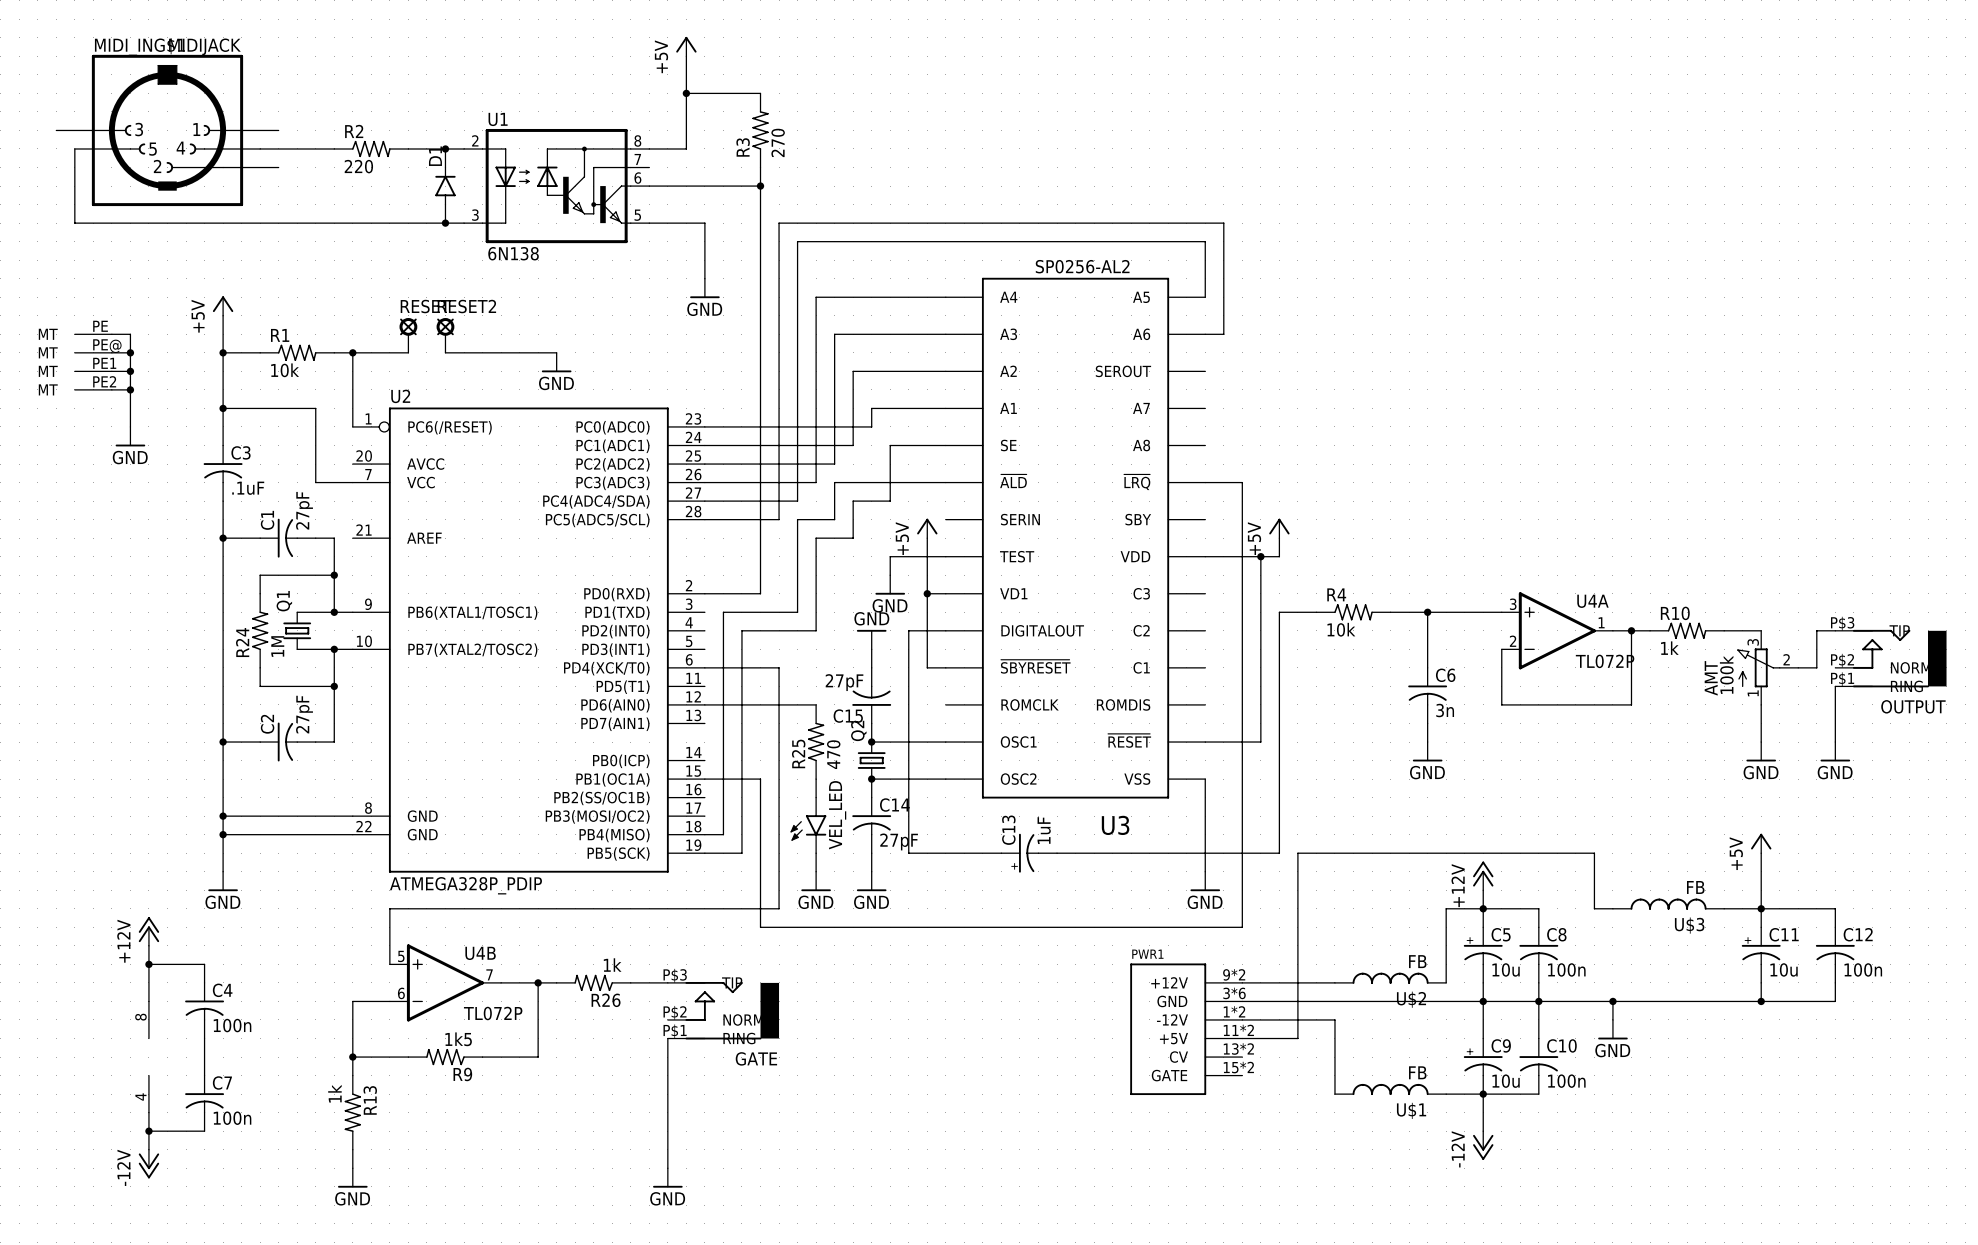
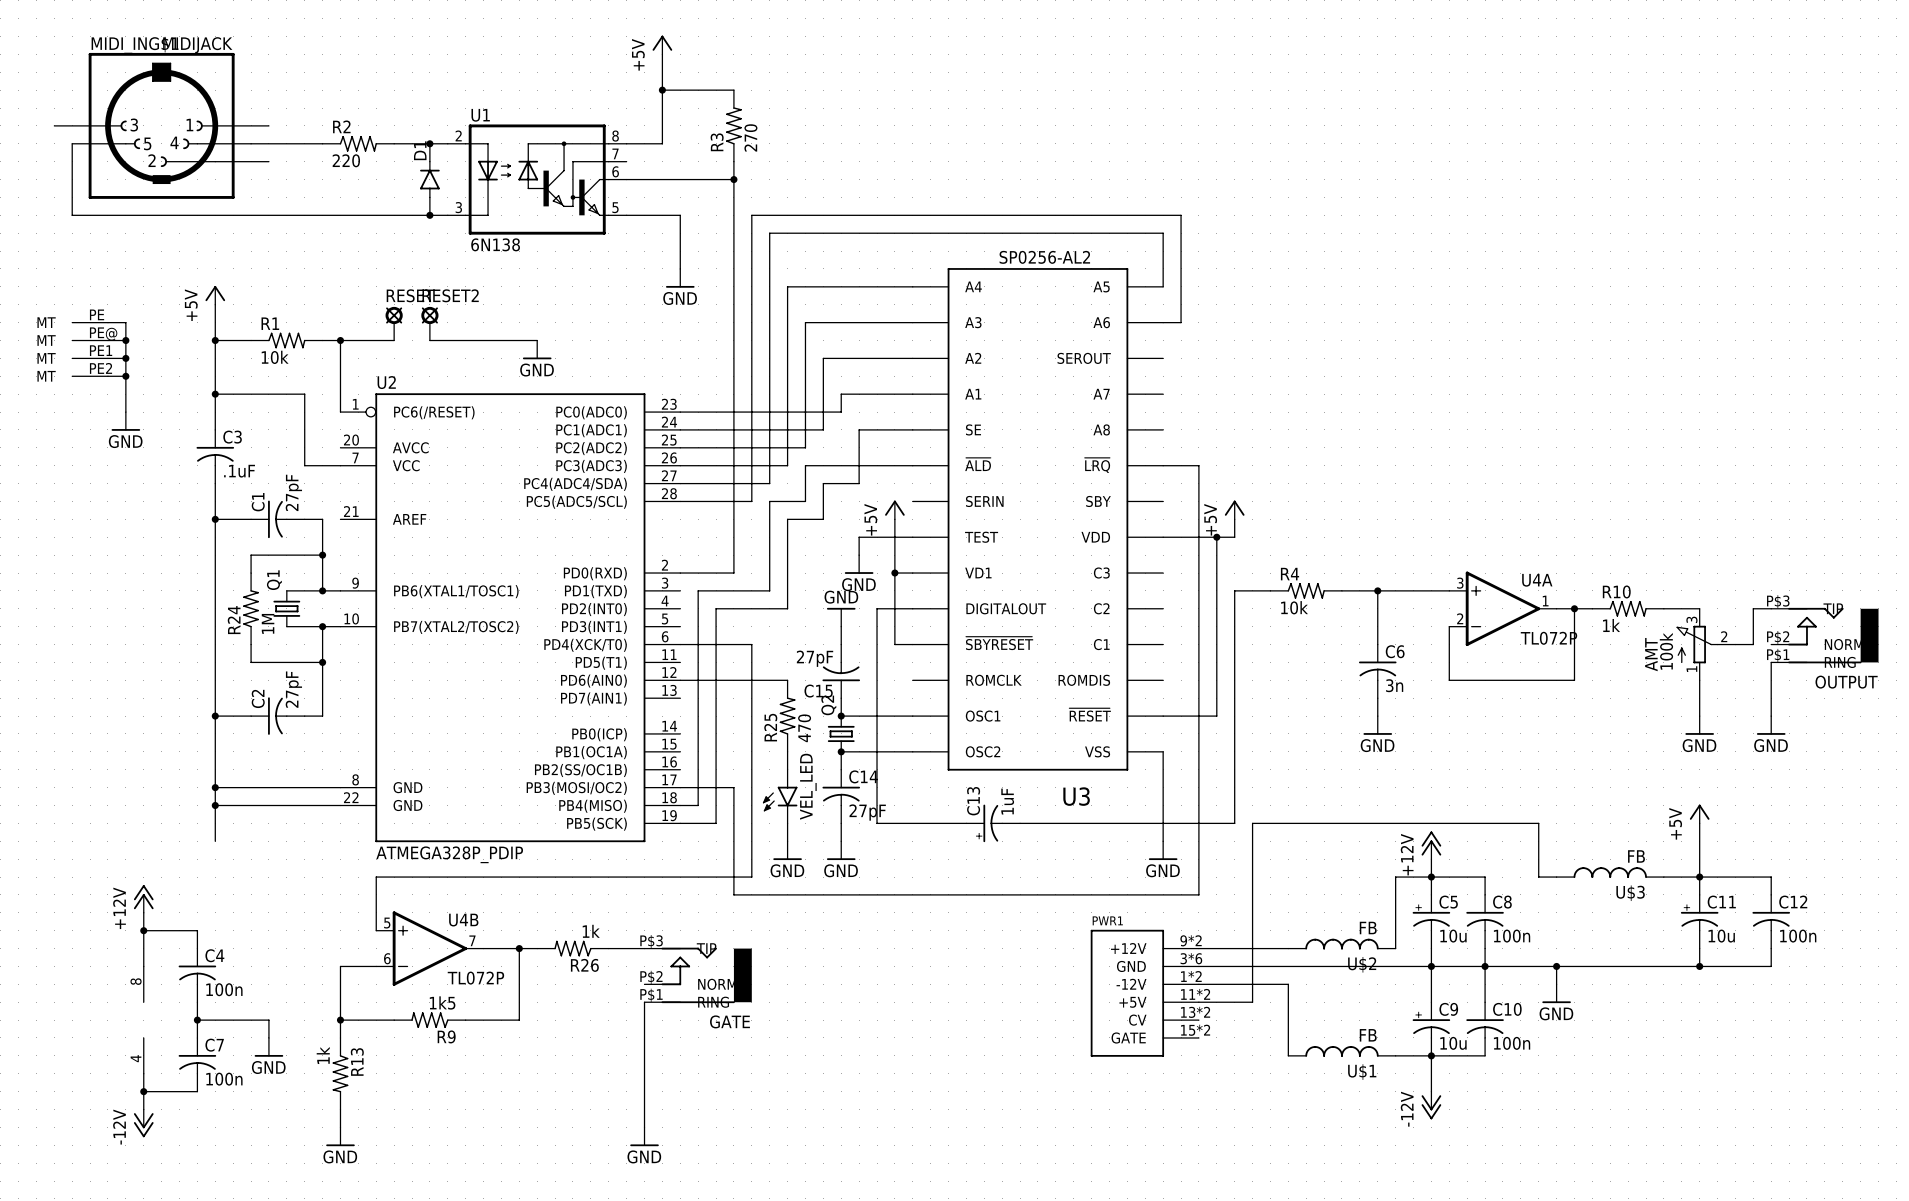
wire: (704, 779) (760, 779) (760, 816) -> (680, 787) (733, 787)
power symbol: GND (223, 881) -> none
wire: none -> (197, 1020) (268, 1020) (268, 1037)
junction: none -> (197, 1020)
power symbol: none -> GND (268, 1047)

